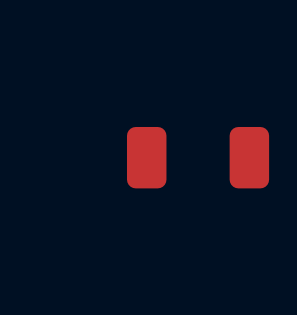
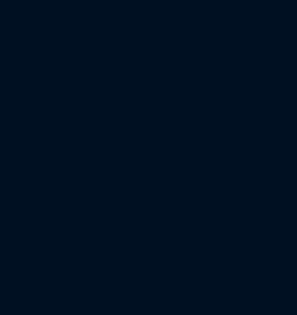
part: (198, 157) -> none

